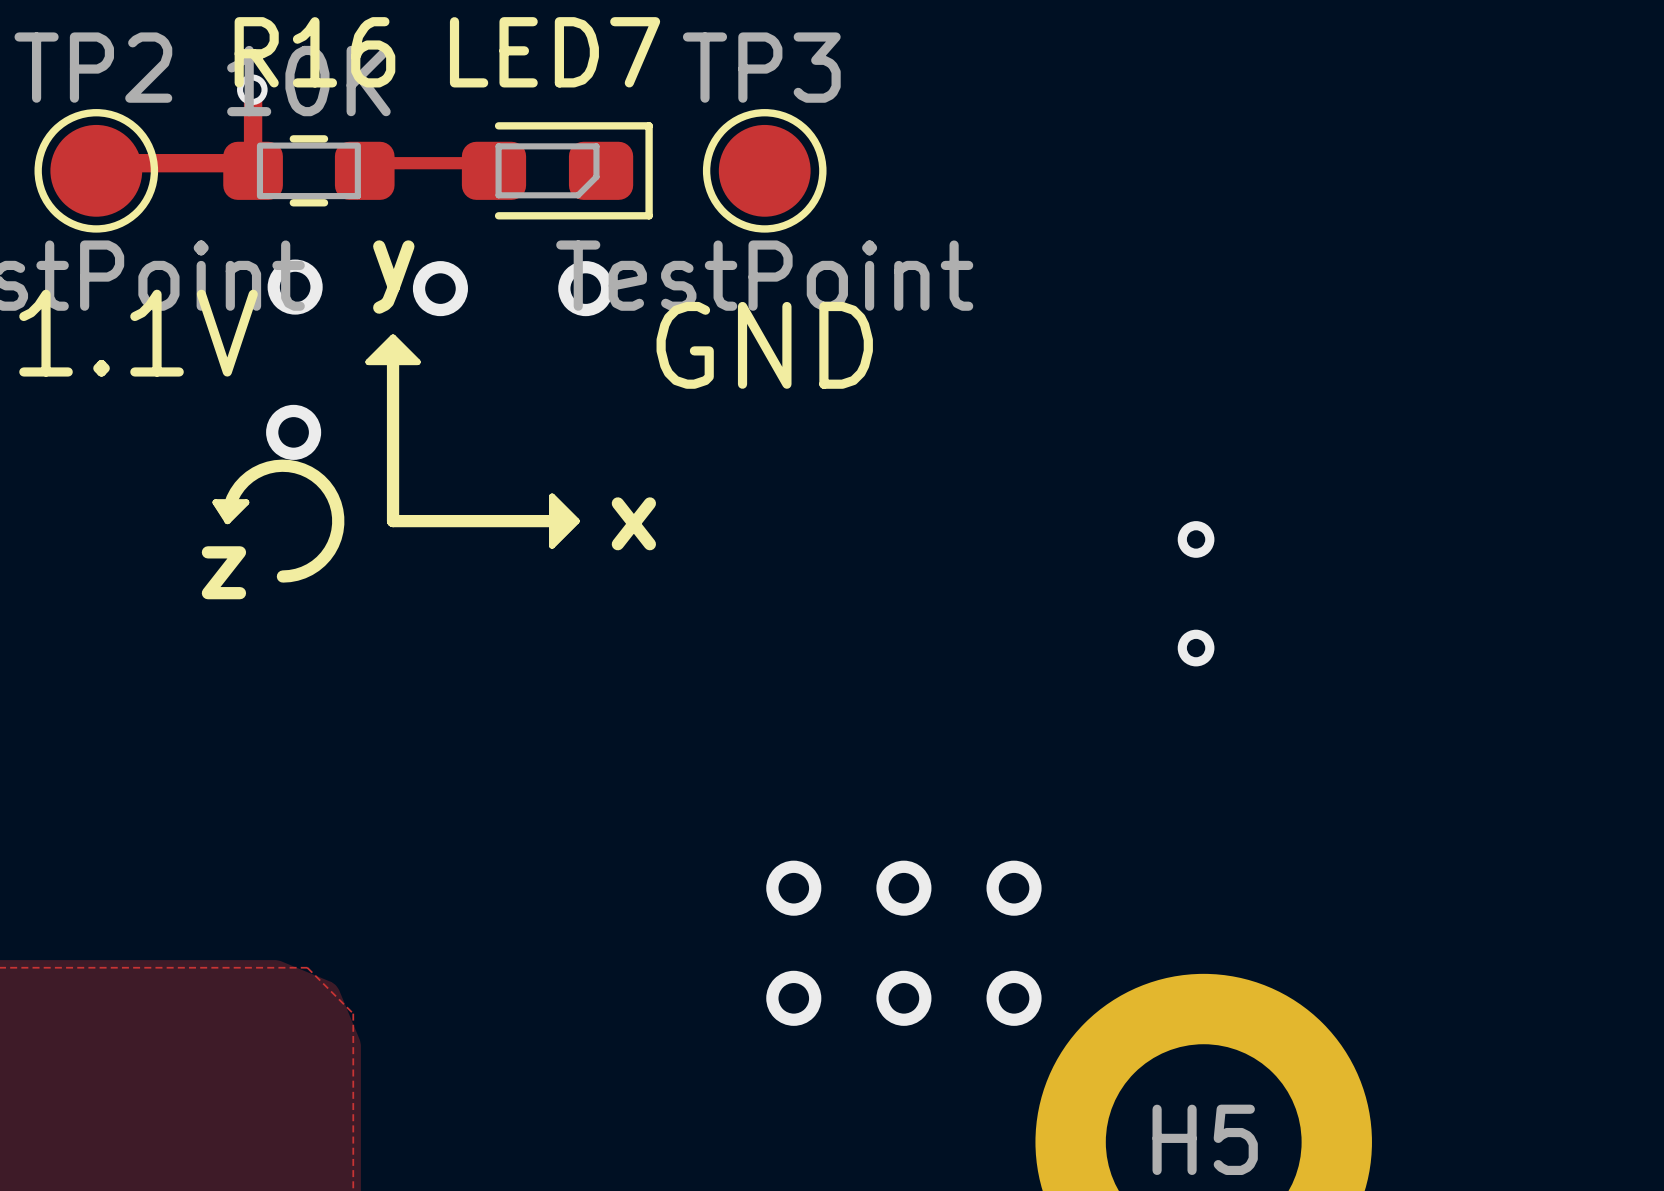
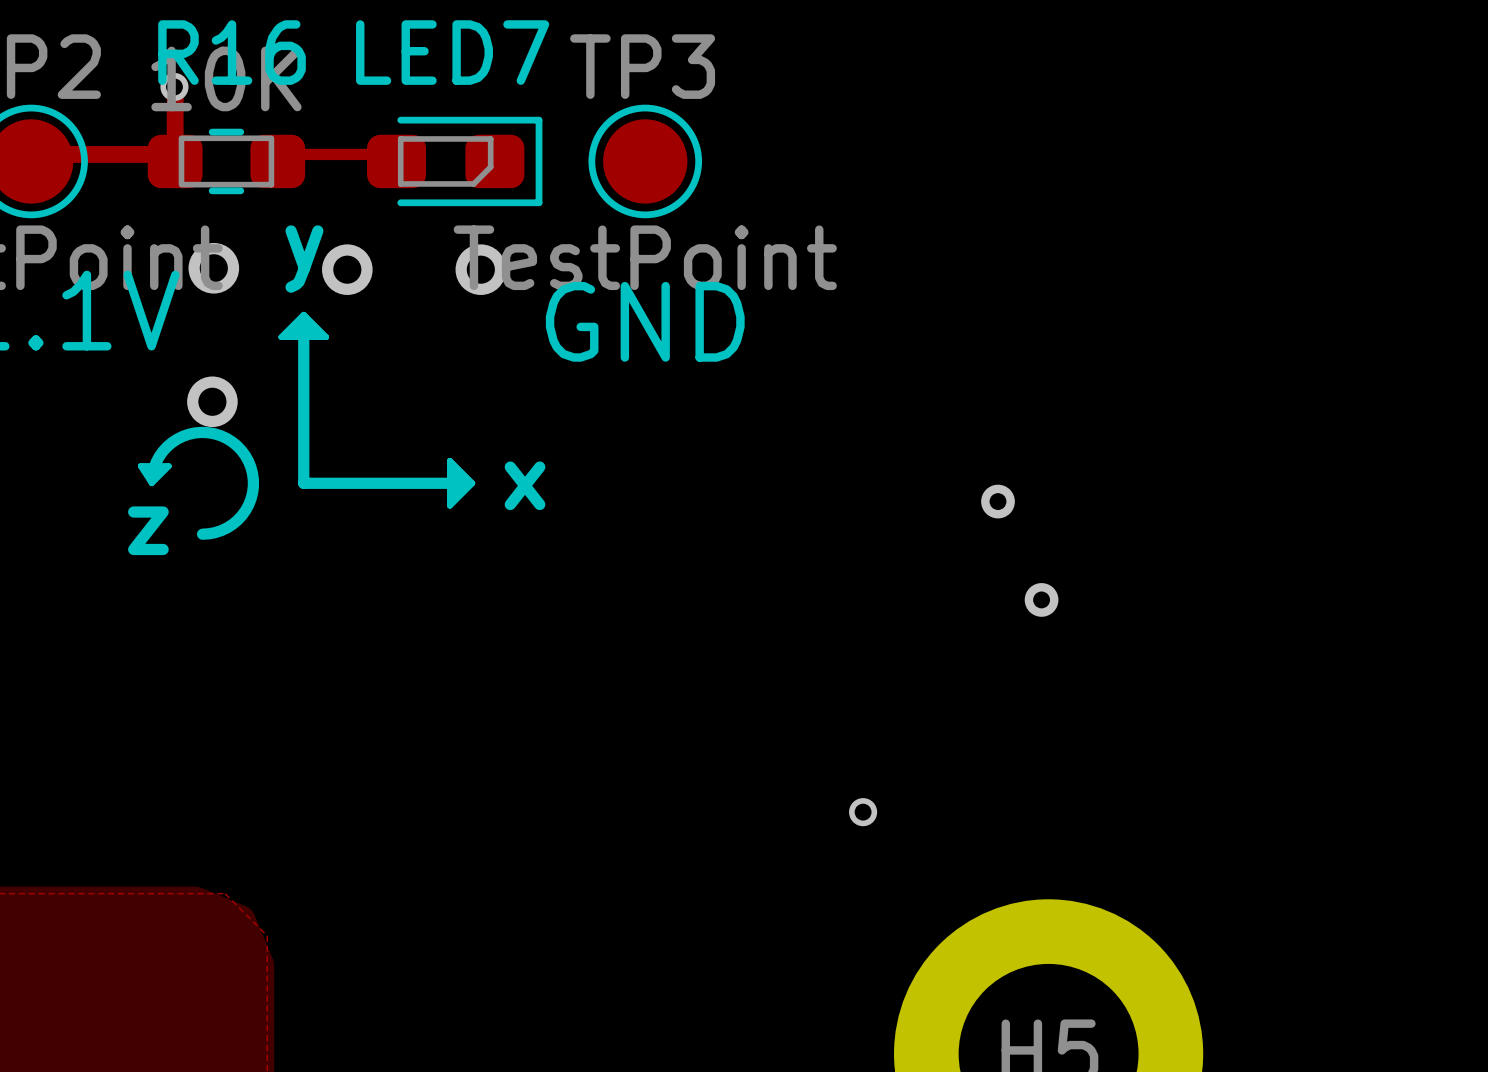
via position: (1196, 539) -> (998, 501)
via size: [986, 860, 1042, 916] -> [849, 798, 878, 827]
via: (793, 888) -> none
via: (903, 888) -> none
via: (793, 998) -> none
via: (903, 998) -> none
via: (1014, 998) -> none

